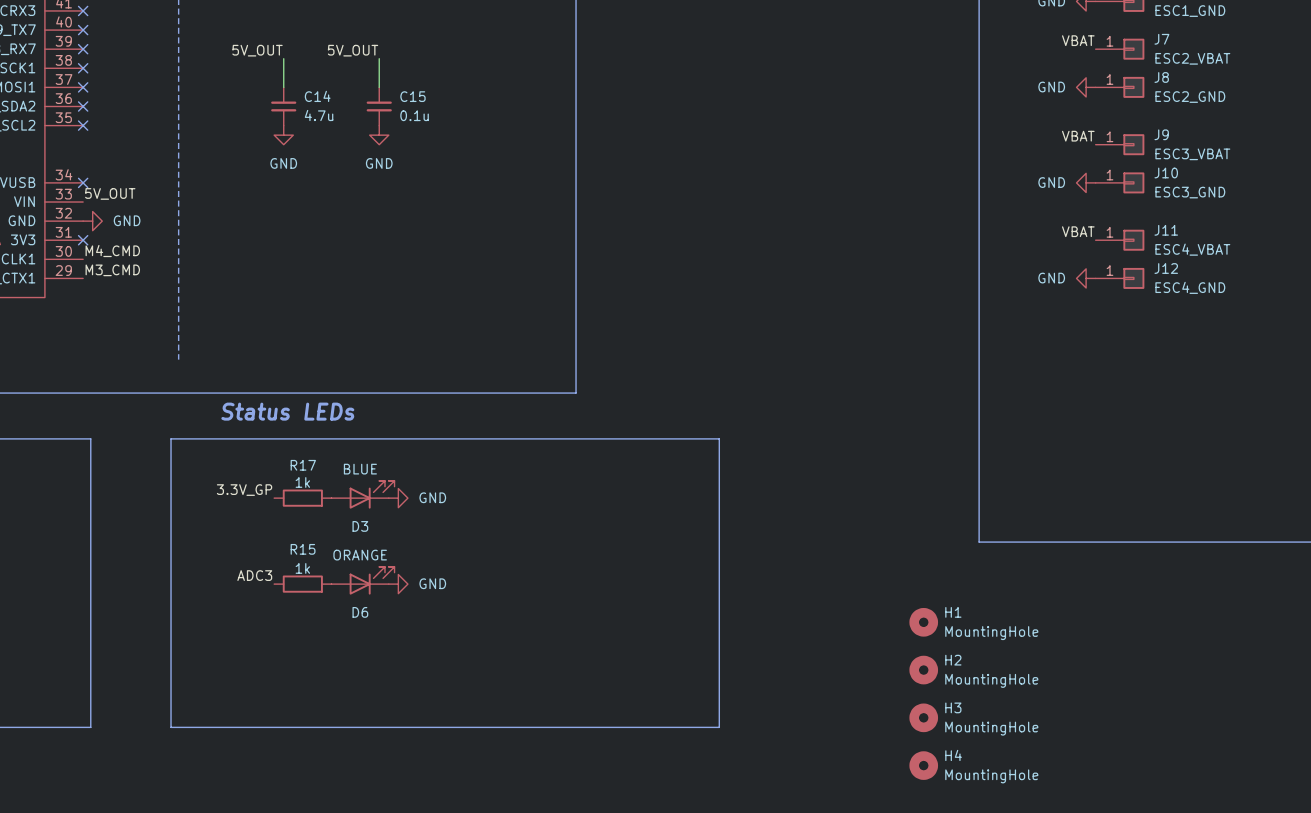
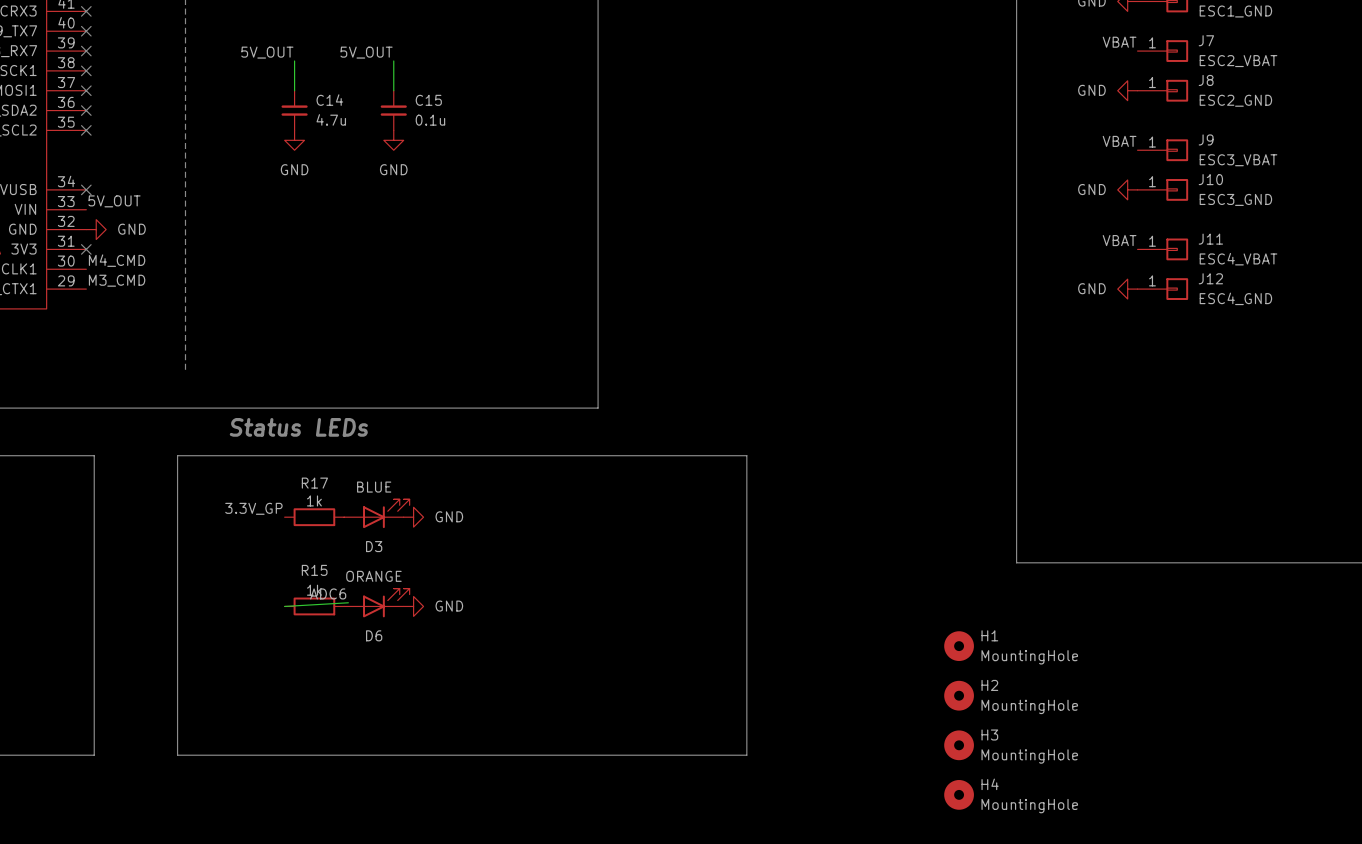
label: none -> ADC6 (328, 593)
label: ADC3 (254, 575) -> none
wire: none -> (348, 602) (284, 606)

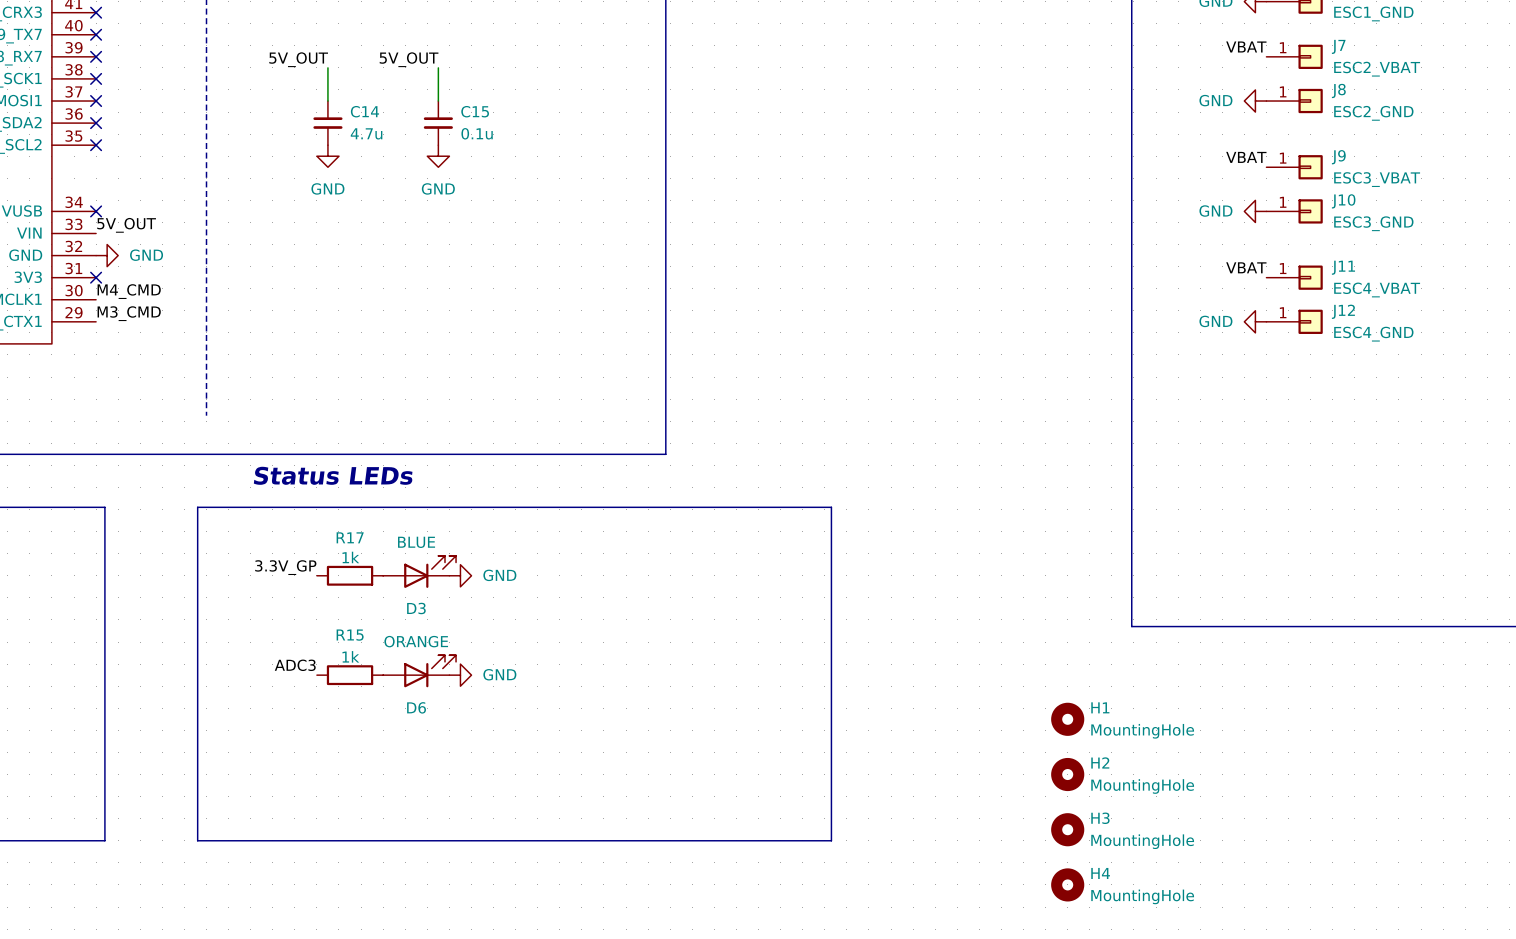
label: ADC6 (328, 593) -> none
label: none -> ADC3 (295, 665)
wire: (348, 602) (284, 606) -> none

